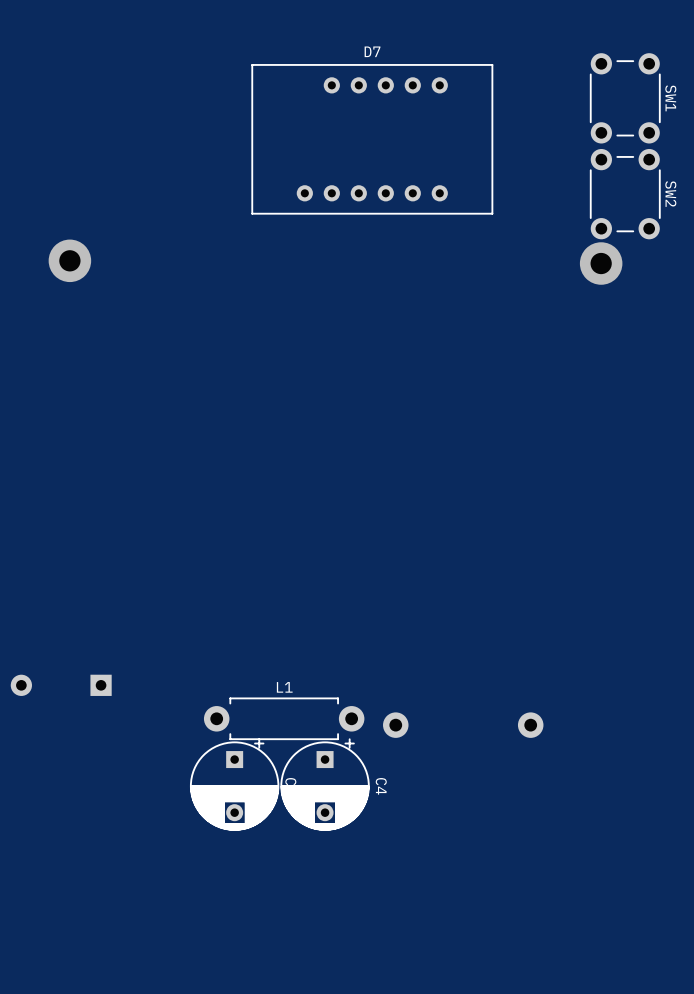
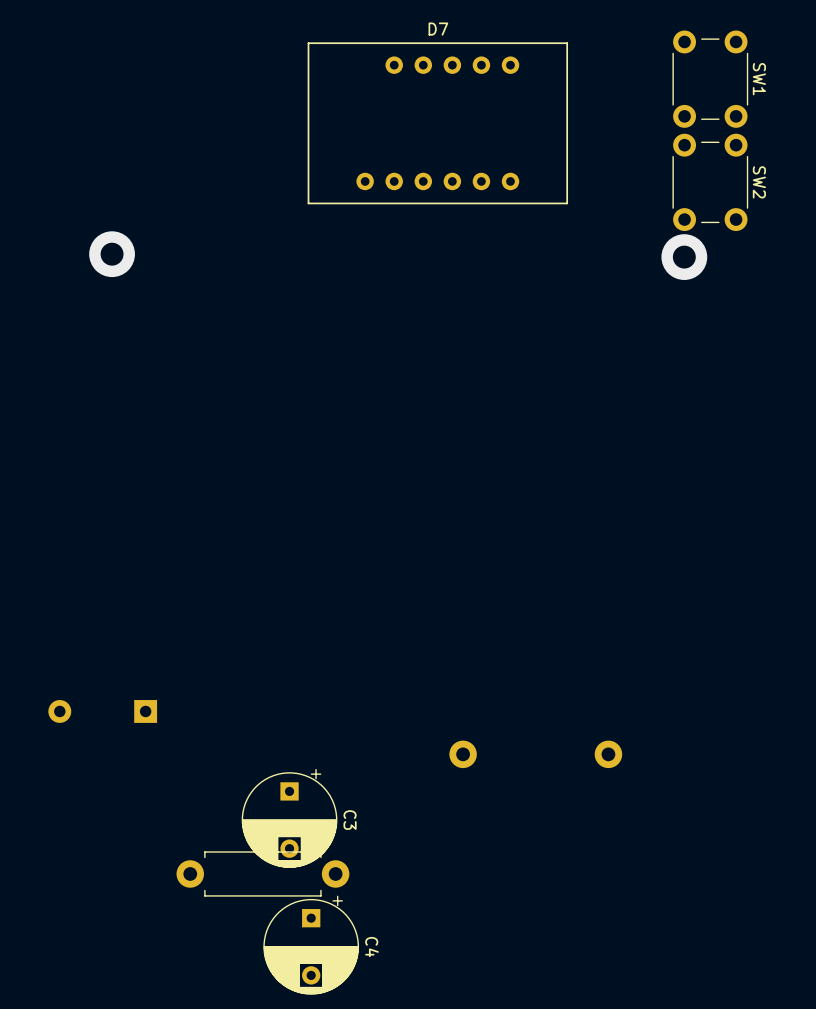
L1 position: (284, 718) -> (262, 873)
C4 position: (325, 784) -> (311, 945)

